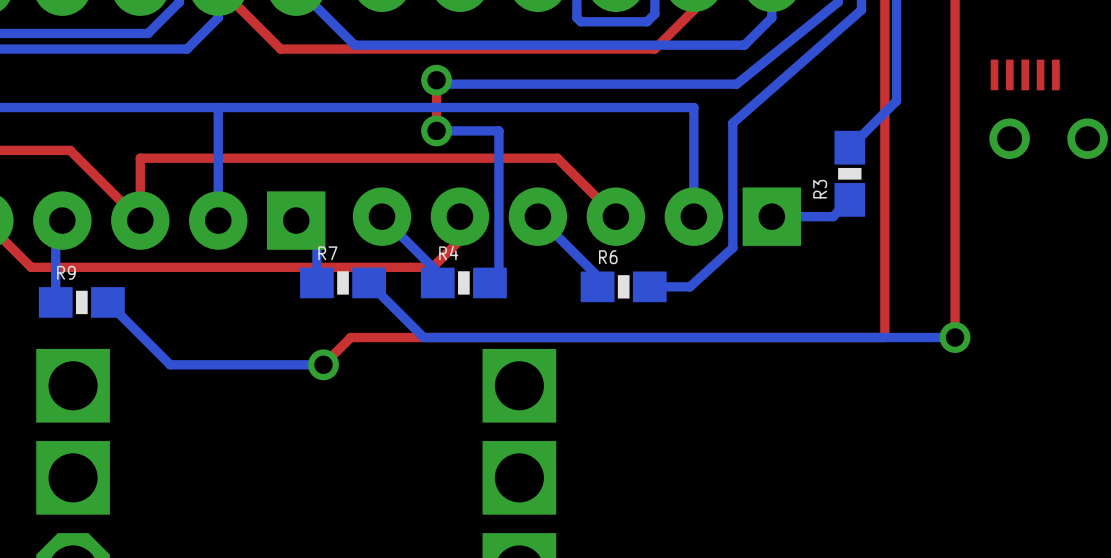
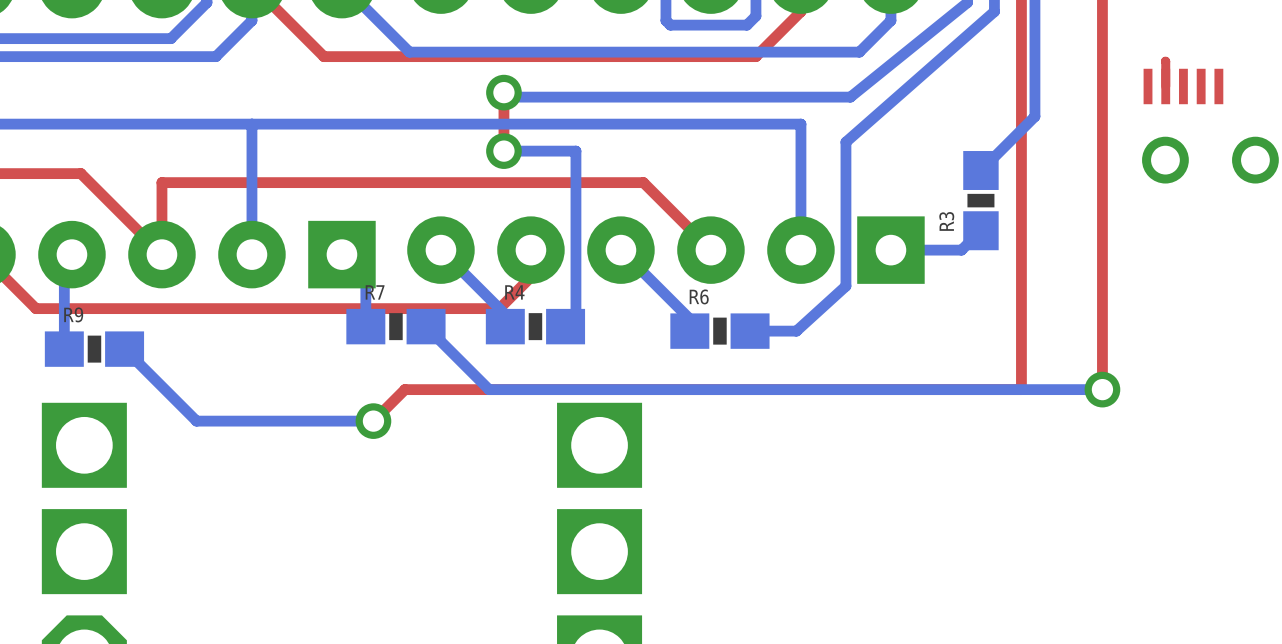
top track: none -> (1165, 61) (1165, 86)

